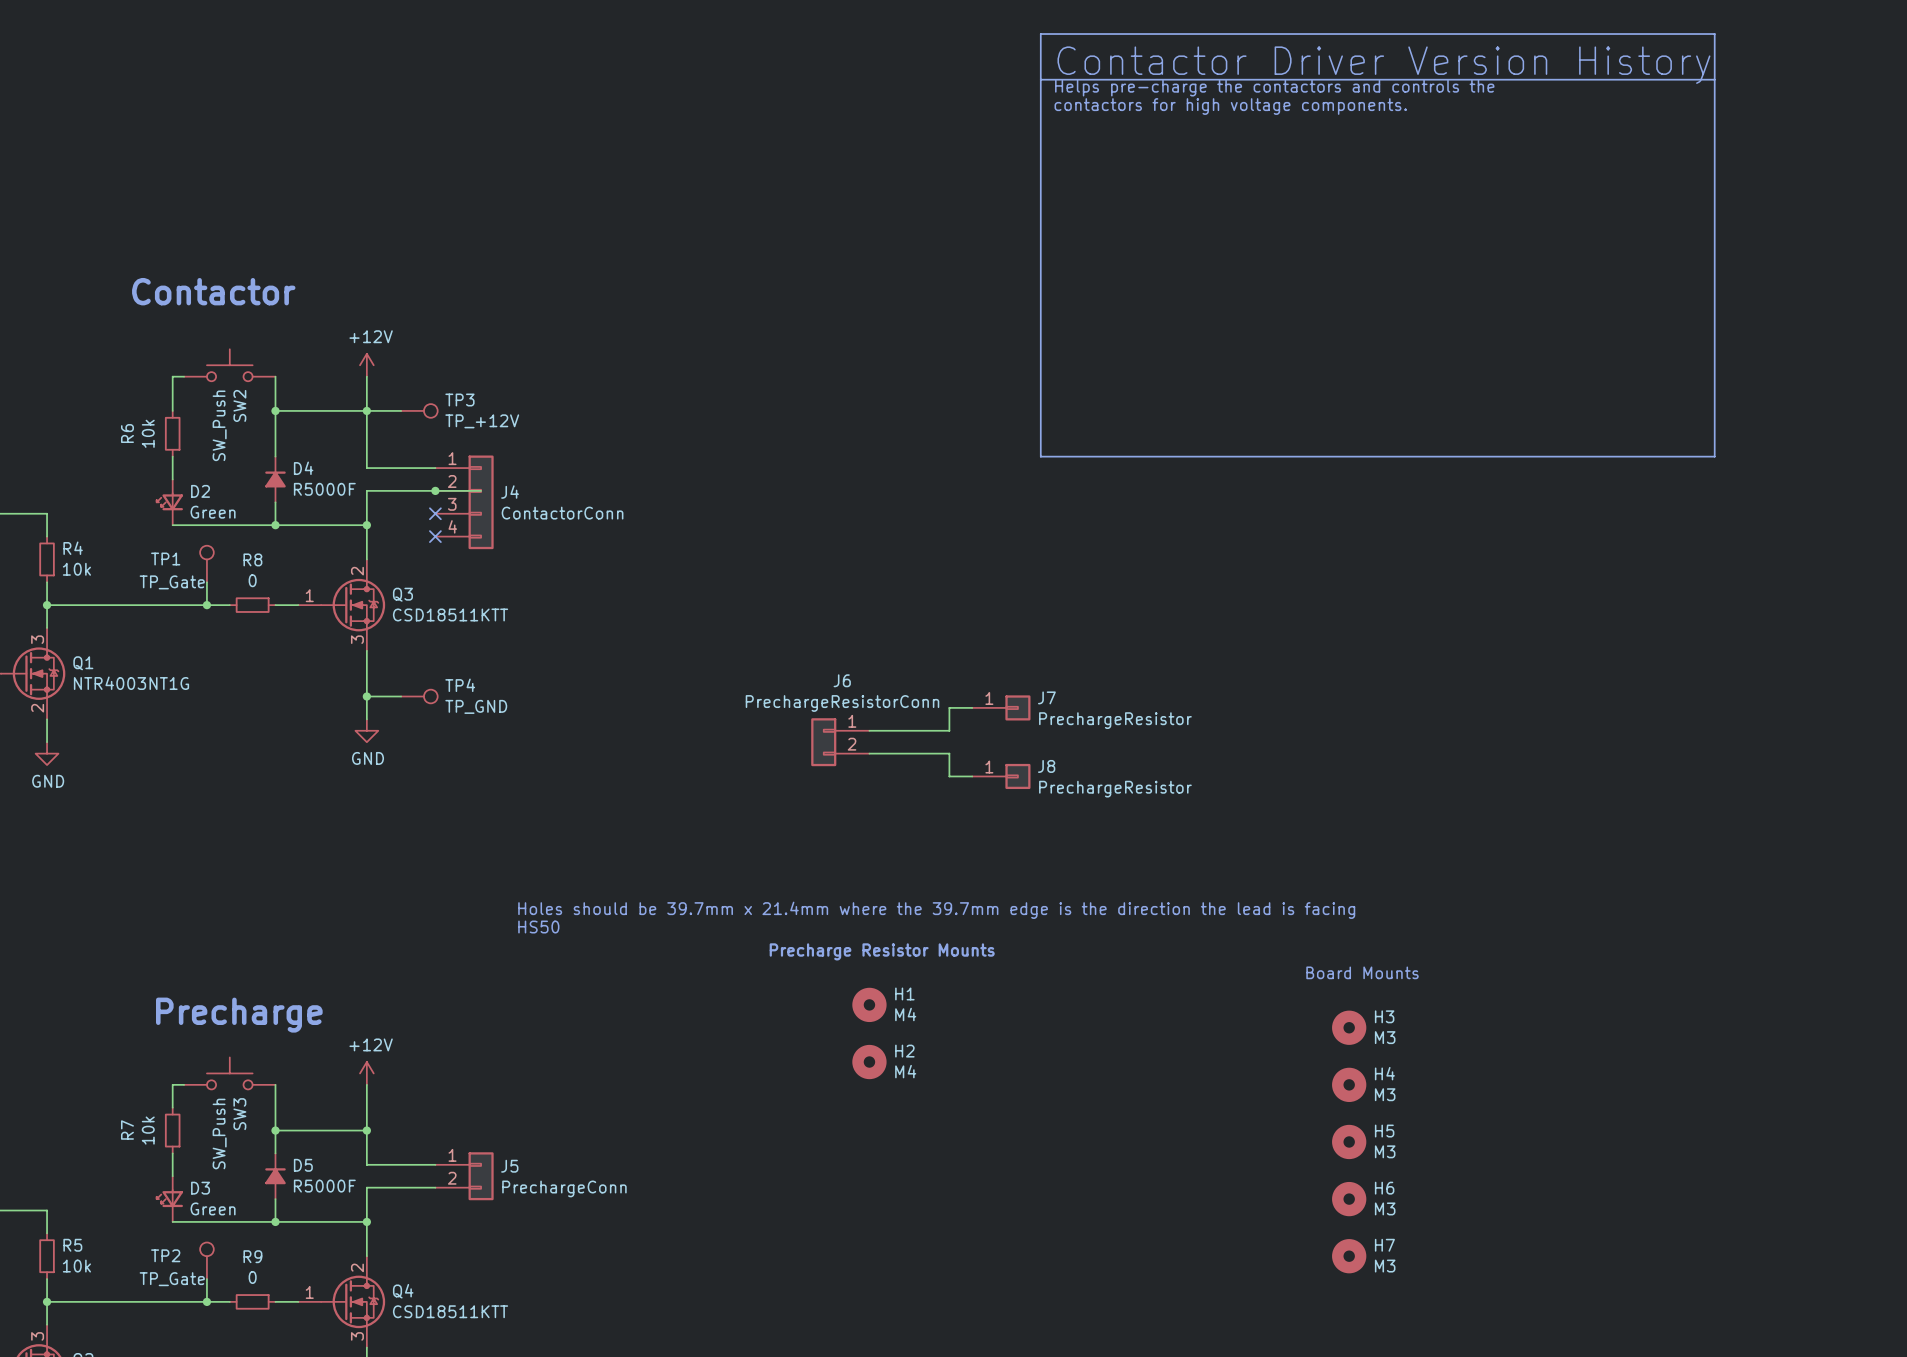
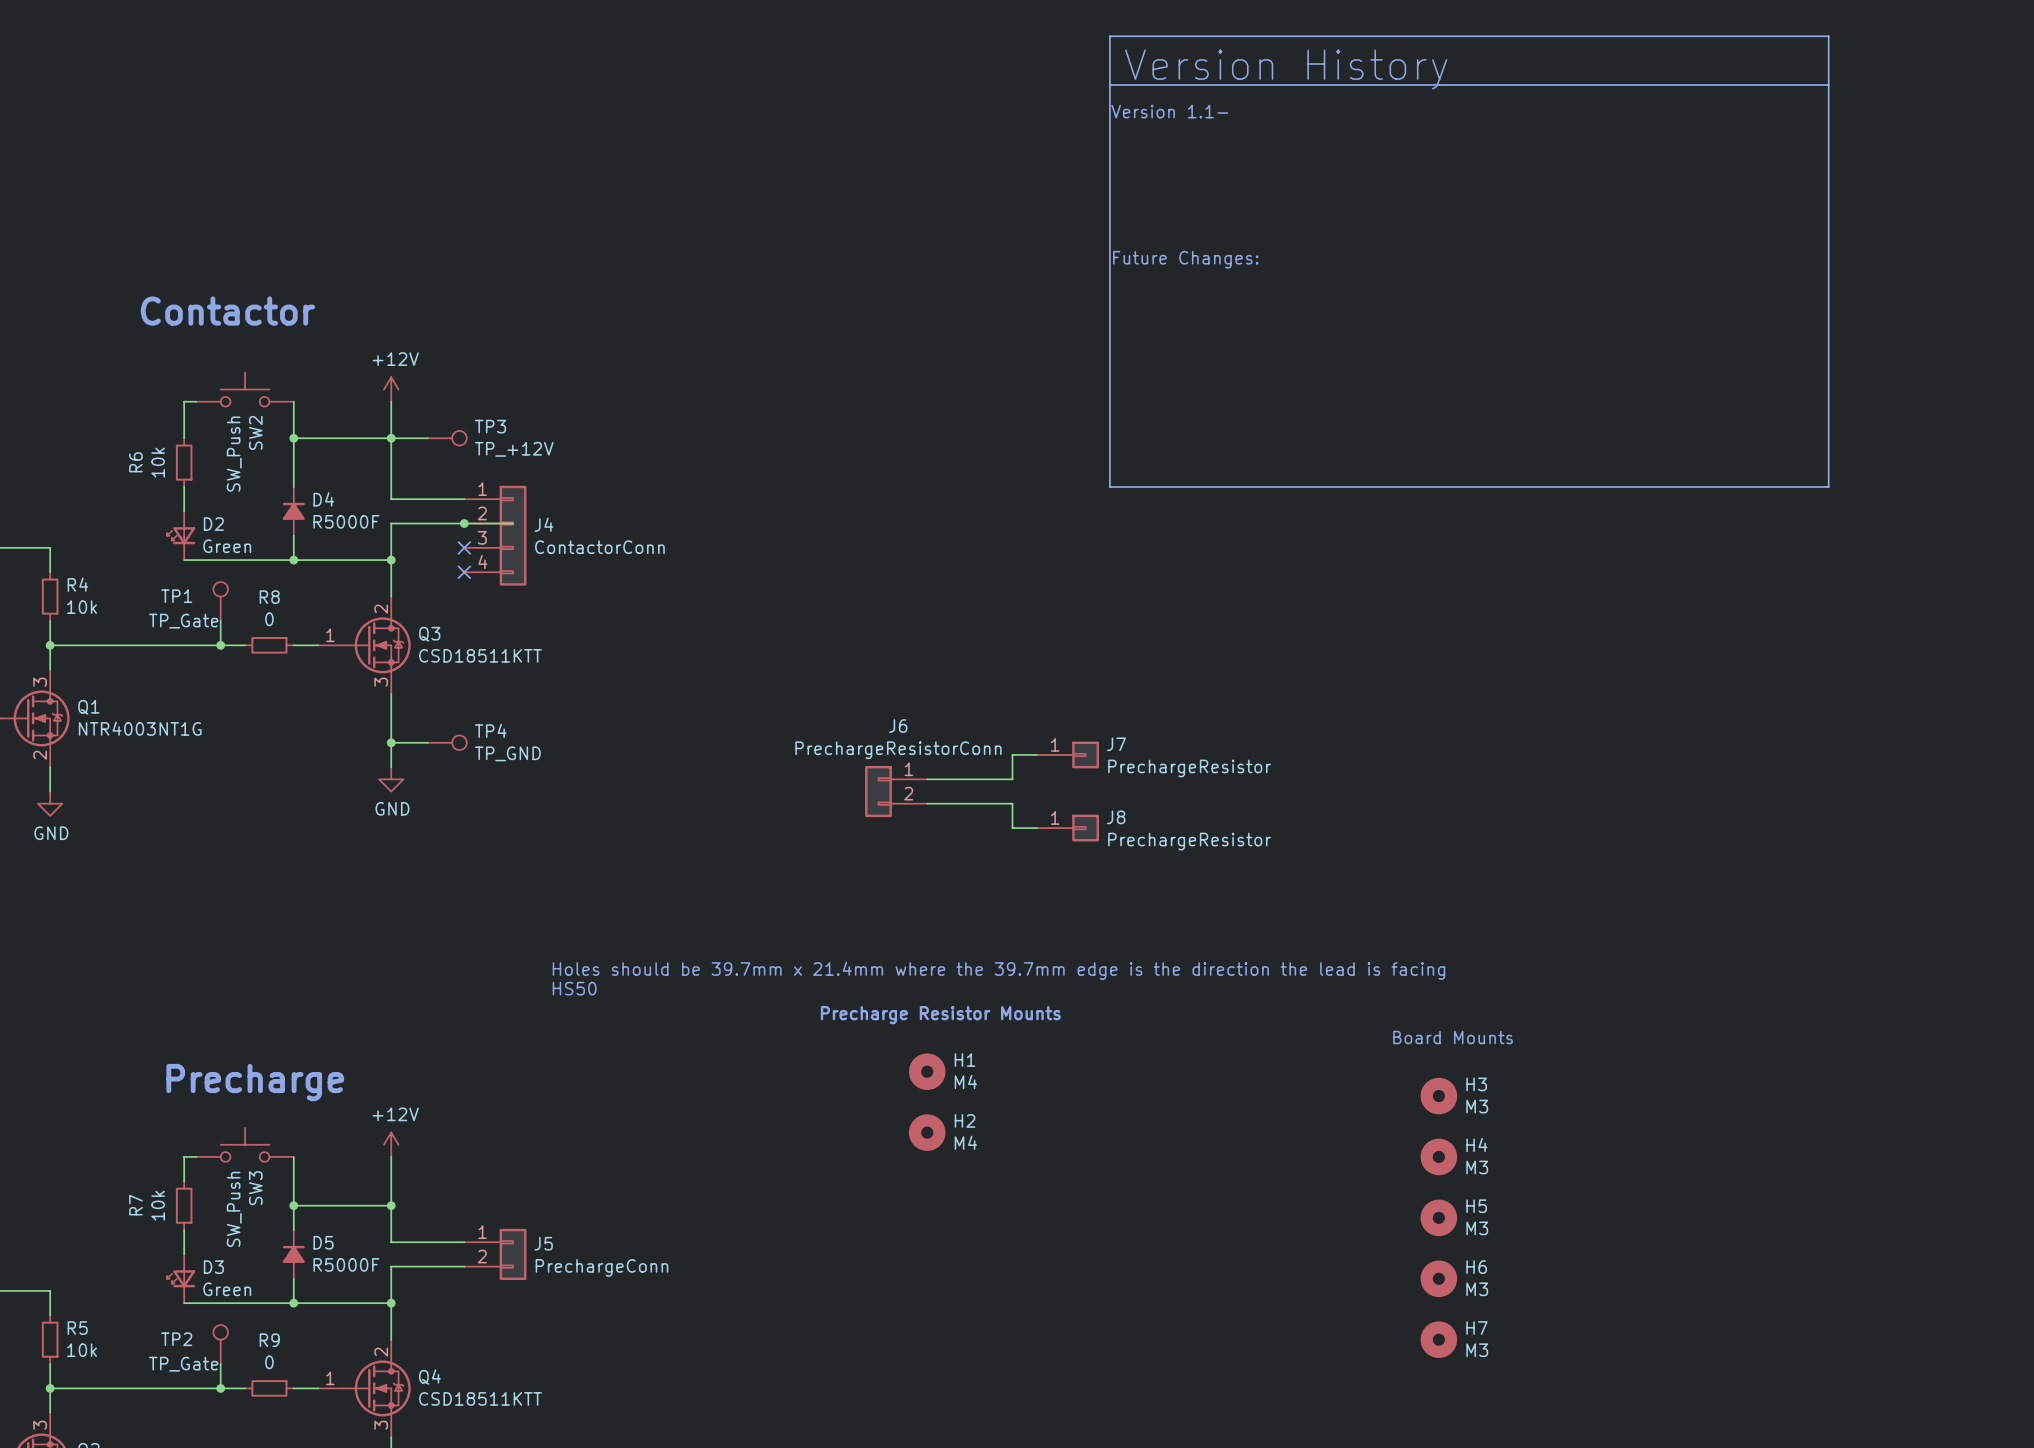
text: Contactor Driver Version History (1383, 65) -> Version History (1286, 69)
text: Helps pre-charge the contactors and controls the (1274, 88) -> none
text: none -> Version 1.1- (1169, 111)
text: contactors for high voltage components. (1230, 106) -> none
text: none -> Future Changes: (1185, 259)

